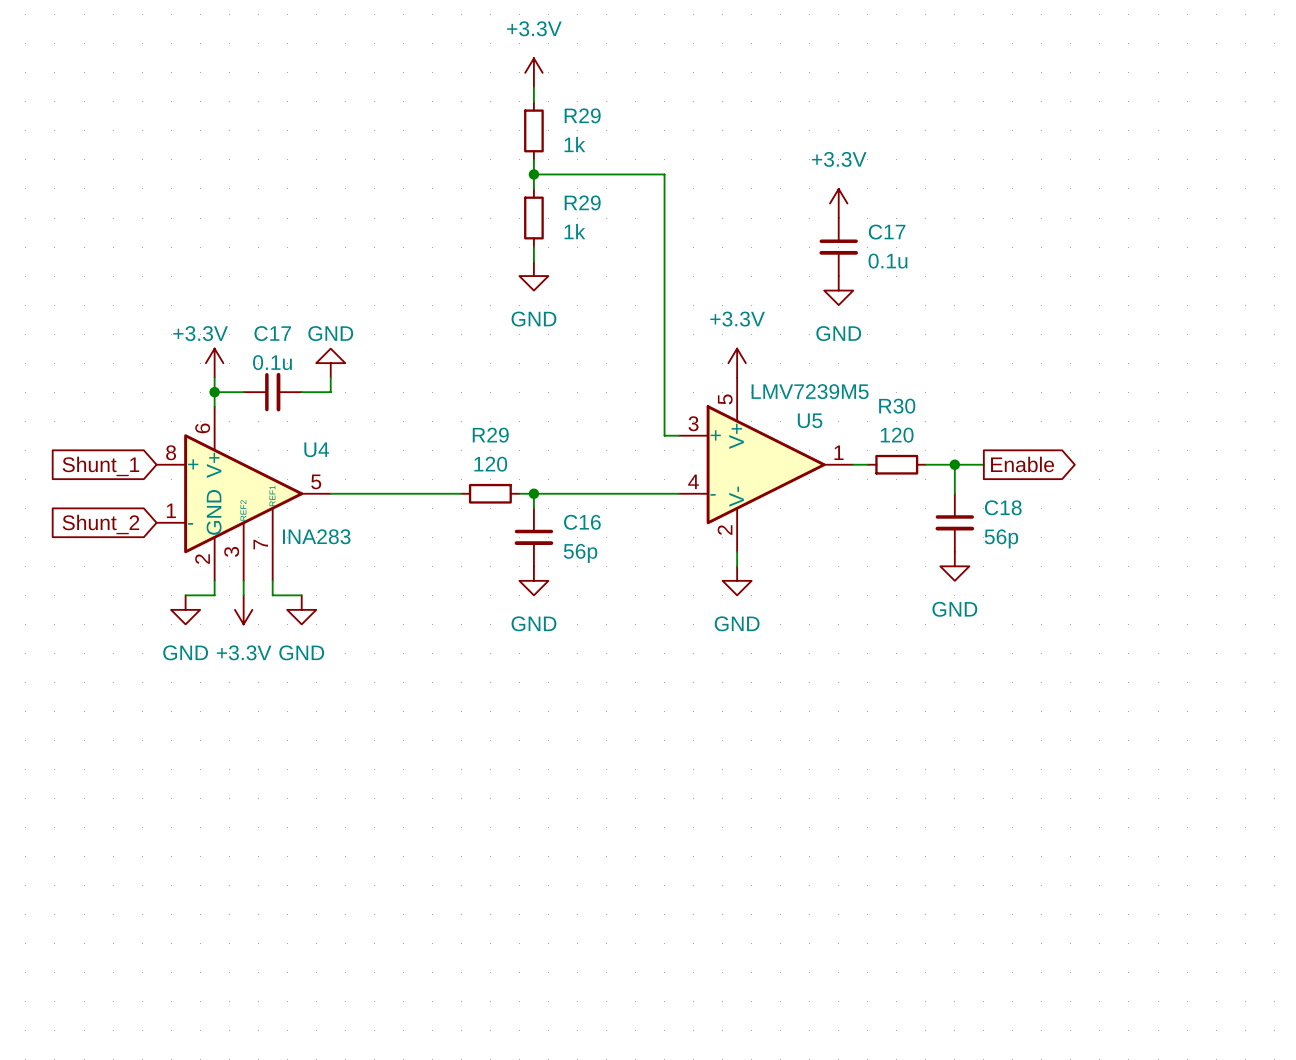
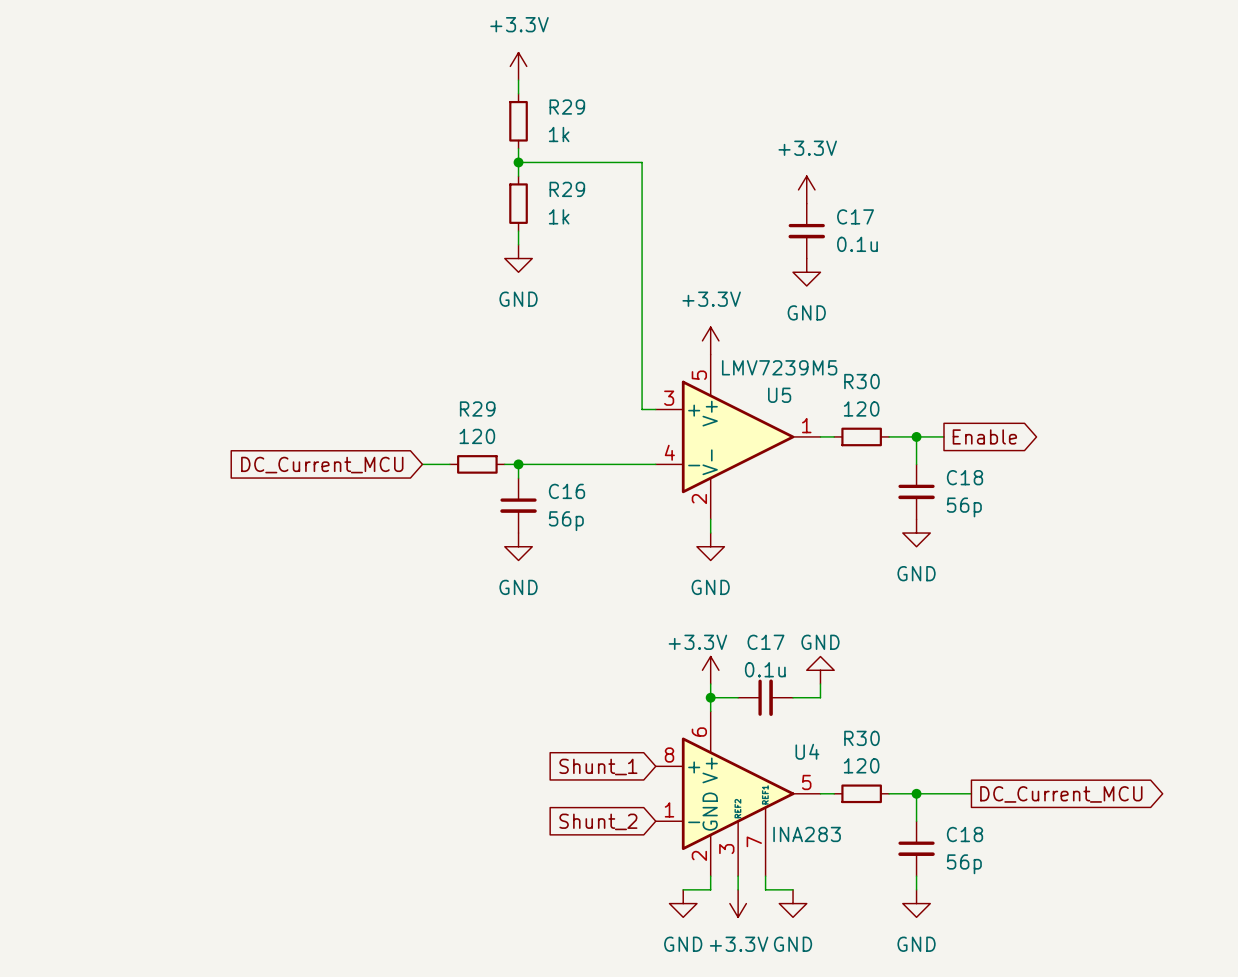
power symbol: +3.3V (214, 363) -> none
power symbol: GND (330, 363) -> none
wire: (214, 377) (214, 406) -> none
wire: (330, 377) (330, 392) (301, 392) -> none
wire: (214, 392) (243, 392) -> none
junction: (214, 392) -> none
C17: 0.1u (272, 392) -> none
global label: Shunt_1 (100, 466) -> none
U4 position: (243, 493) -> (738, 793)
wire: (330, 493) (432, 493) -> none
global label: none -> DC_Current_MCU (322, 465)
global label: Shunt_2 (100, 524) -> none
wire: (214, 580) (214, 595) (185, 595) -> none
wire: (243, 580) (243, 595) -> none
wire: (272, 580) (272, 595) (301, 595) -> none
power symbol: GND (185, 609) -> none
power symbol: +3.3V (243, 609) -> none
power symbol: GND (301, 609) -> none
power symbol: none -> +3.3V (710, 670)
power symbol: none -> GND (820, 670)
wire: none -> (710, 683) (710, 711)
wire: none -> (820, 683) (820, 697) (793, 697)
wire: none -> (710, 697) (738, 697)
junction: none -> (710, 697)
C17: none -> 0.1u (765, 697)
global label: none -> Shunt_1 (598, 766)
wire: none -> (820, 793) (834, 793)
R30: none -> 120 (861, 793)
wire: none -> (889, 793) (971, 793)
wire: none -> (916, 793) (916, 821)
junction: none -> (916, 793)
global label: none -> DC_Current_MCU (1061, 794)
global label: none -> Shunt_2 (598, 821)
C18: none -> 56p (916, 848)
wire: none -> (710, 876) (710, 889) (683, 889)
wire: none -> (738, 876) (738, 889)
wire: none -> (765, 876) (765, 889) (793, 889)
wire: none -> (916, 876) (916, 889)
power symbol: none -> GND (683, 903)
power symbol: none -> +3.3V (738, 903)
power symbol: none -> GND (793, 903)
power symbol: none -> GND (916, 903)

